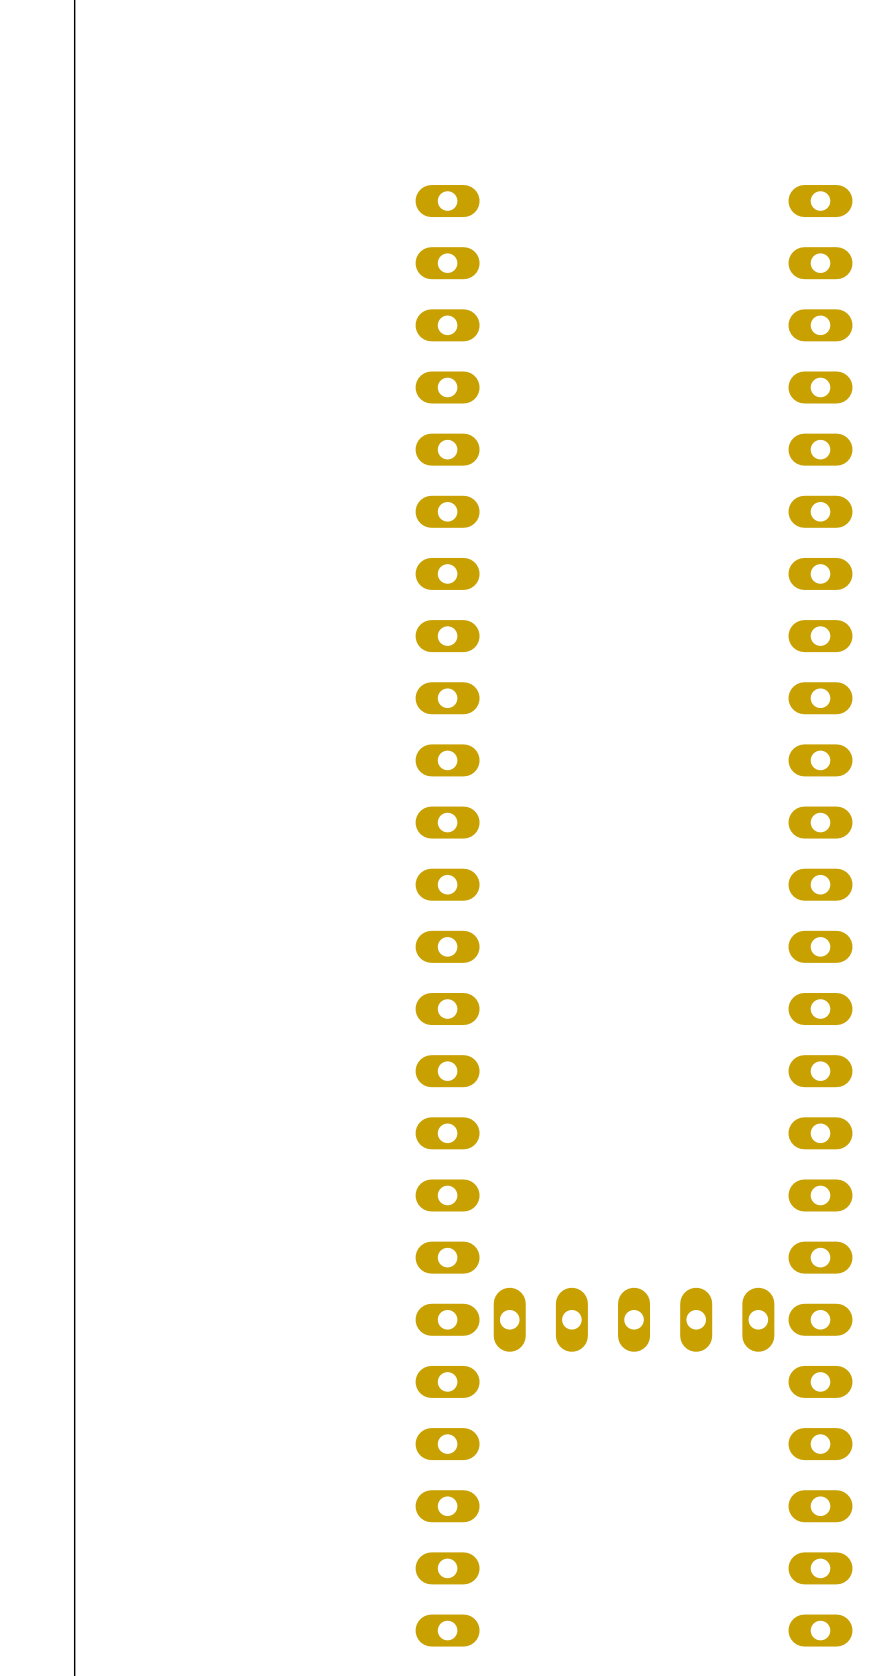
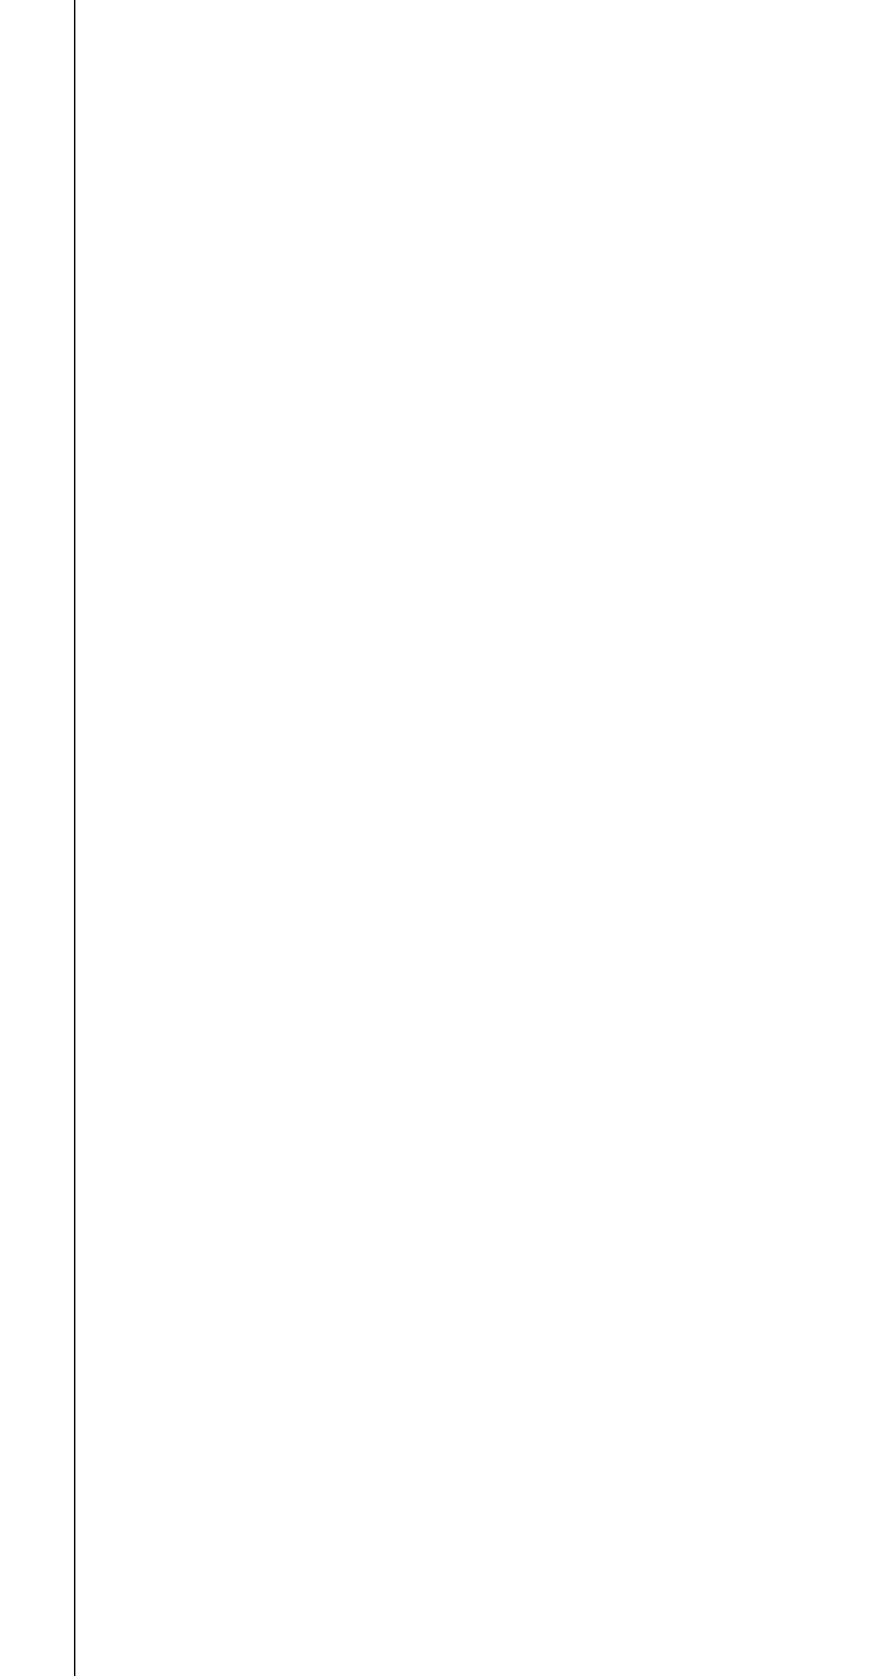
part: (634, 915) -> none

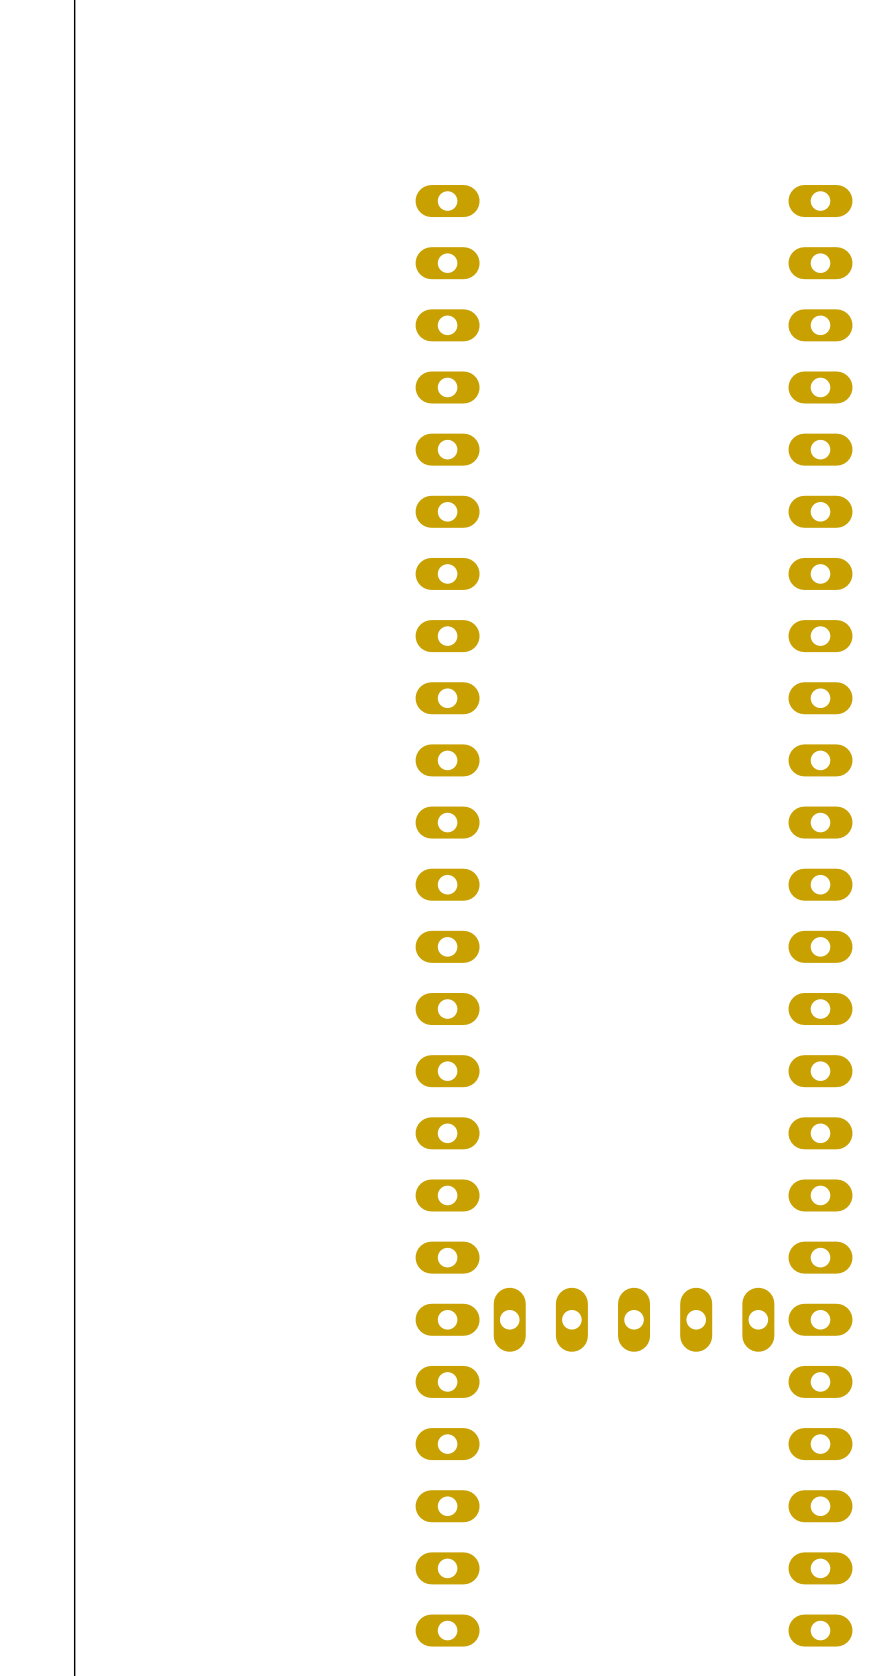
part: none -> (634, 915)

